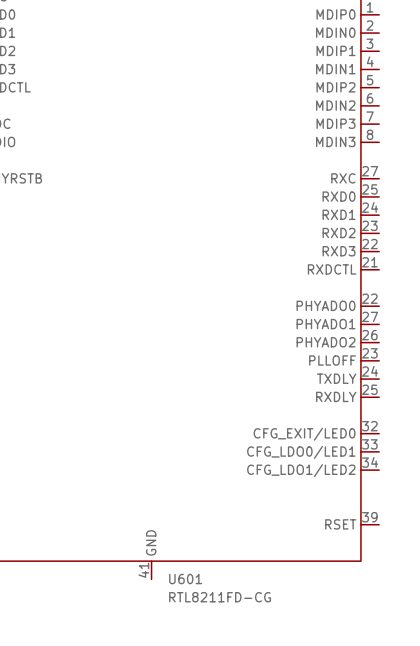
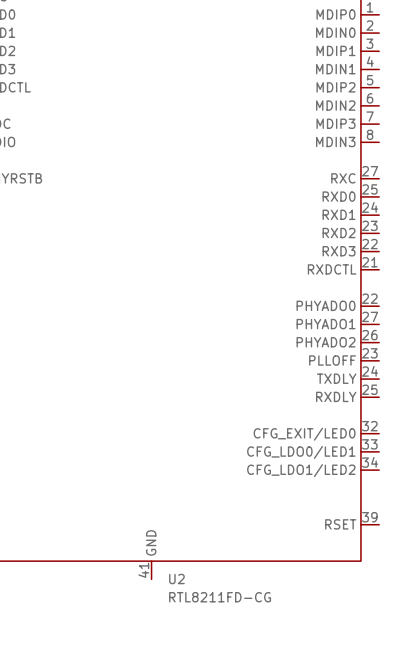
U601 name: U601 (185, 579) -> U2 (176, 579)

